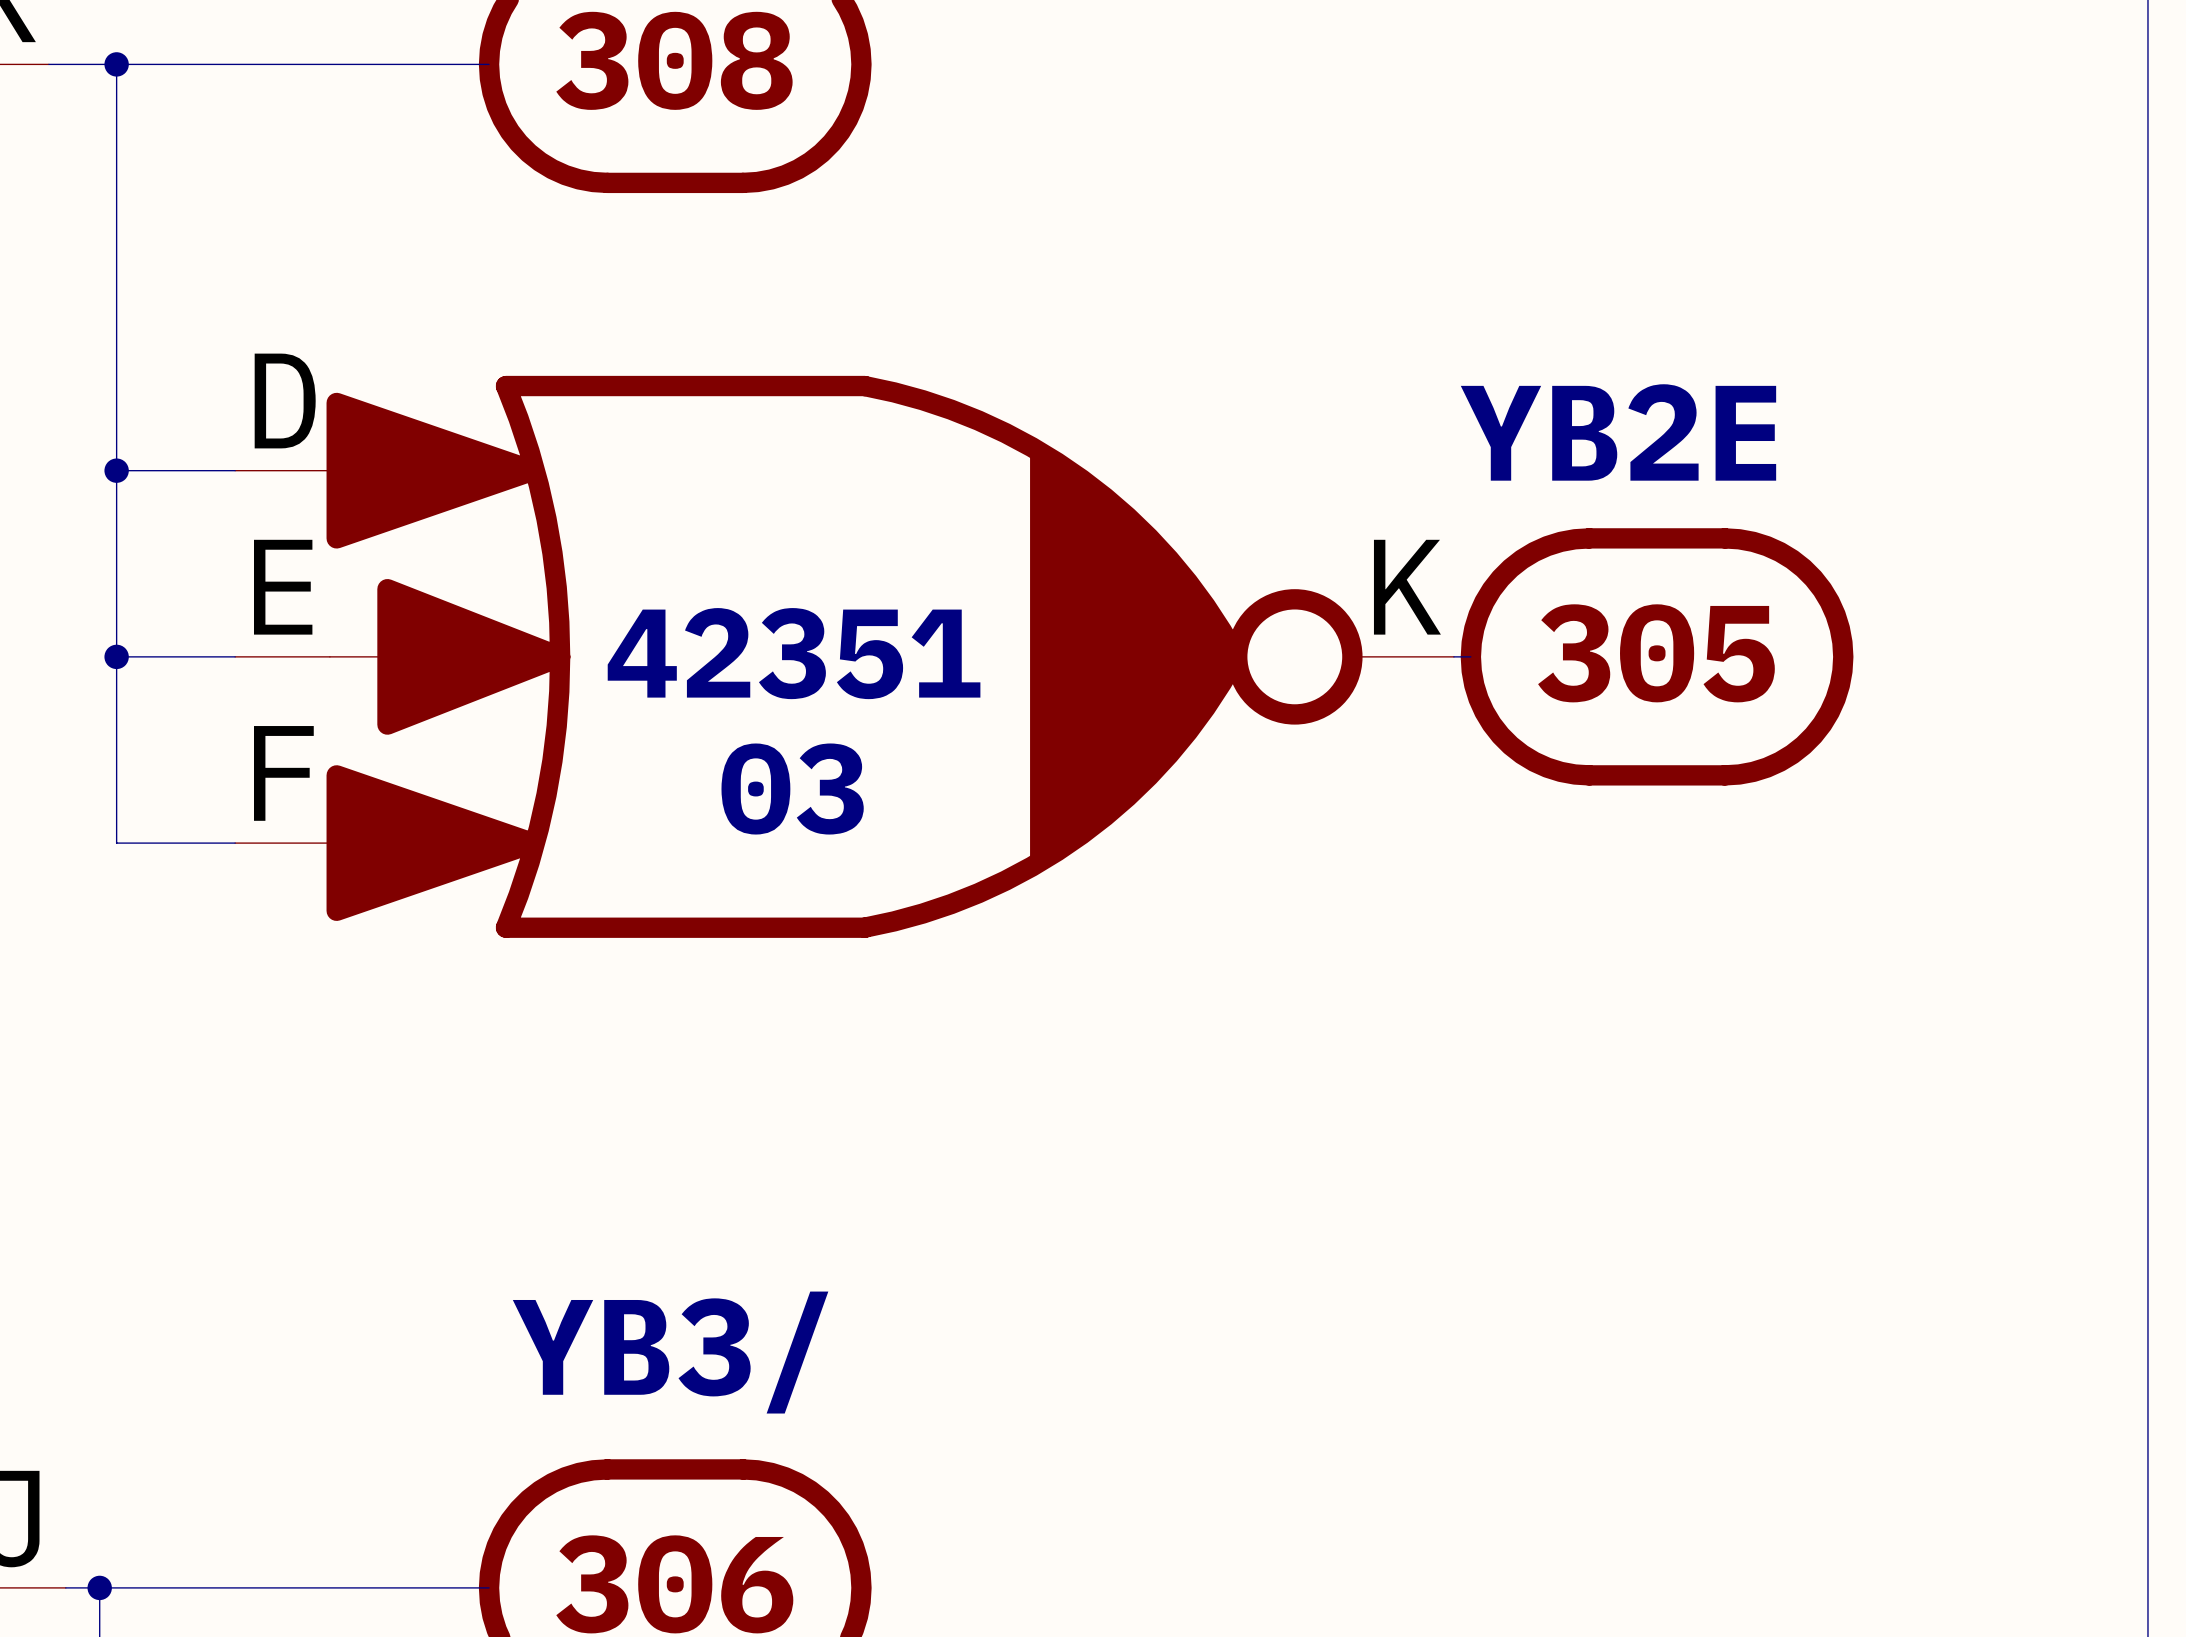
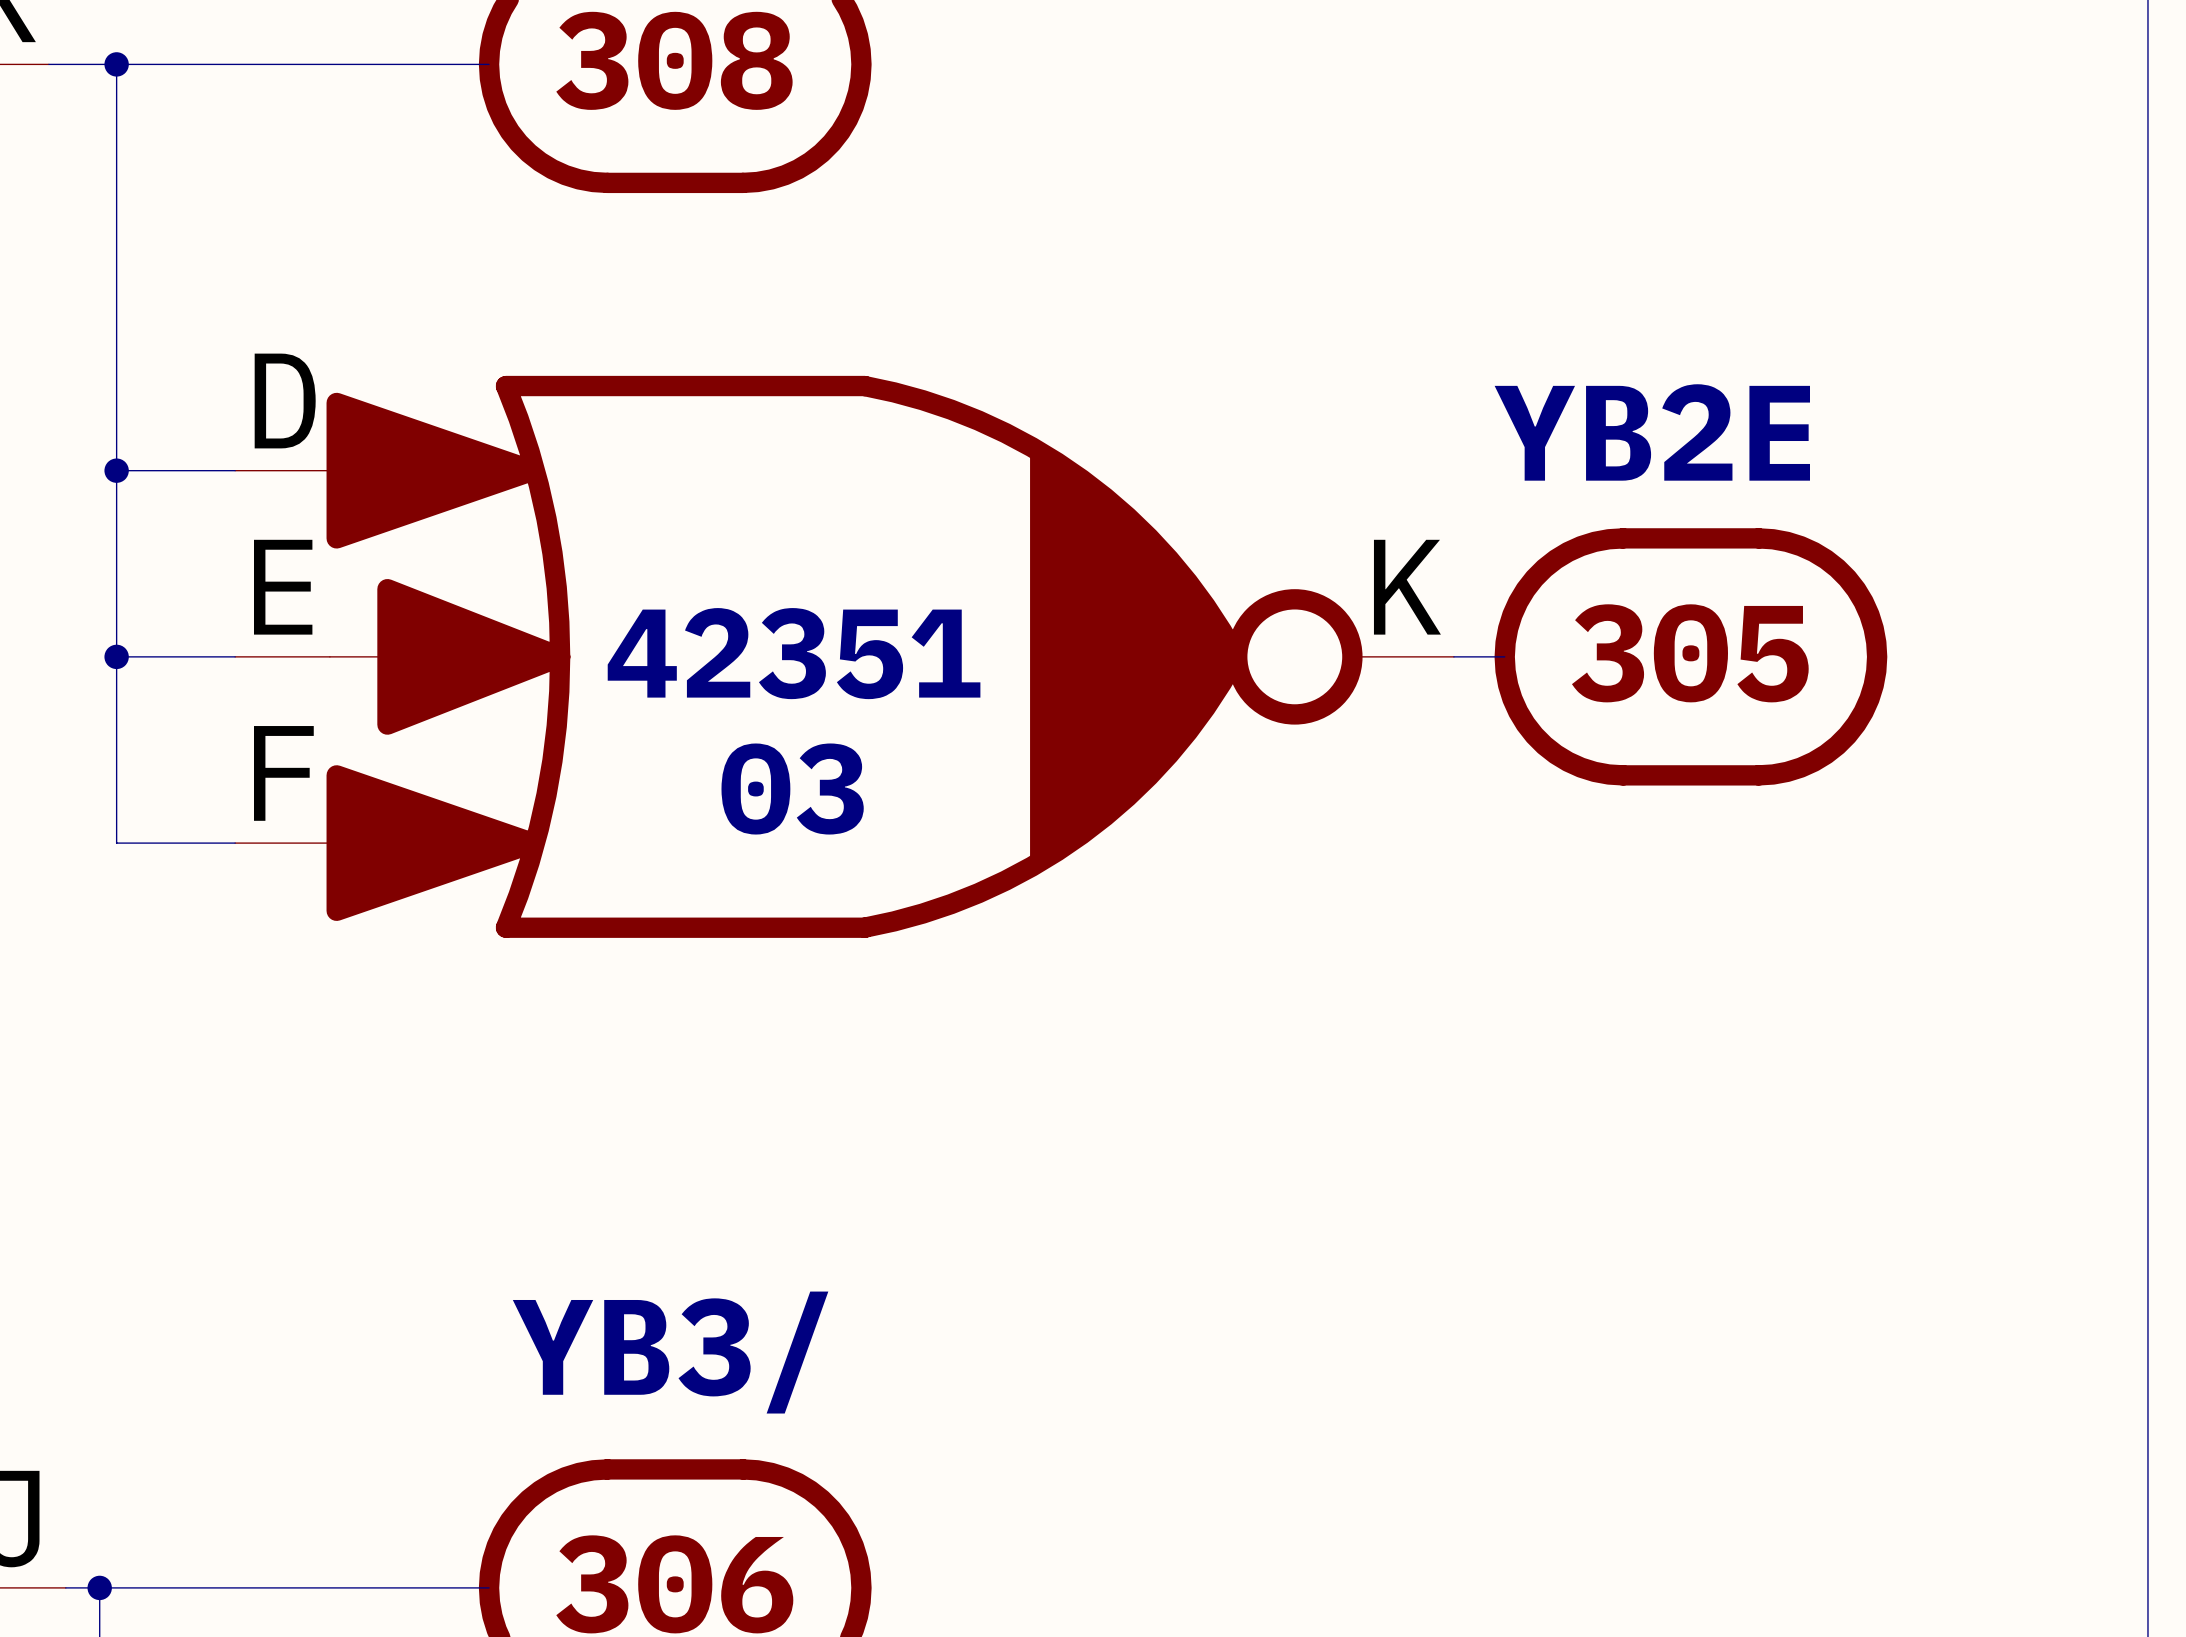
wire: none -> (1470, 656) (1504, 656)
part position: (1657, 656) -> (1690, 656)

